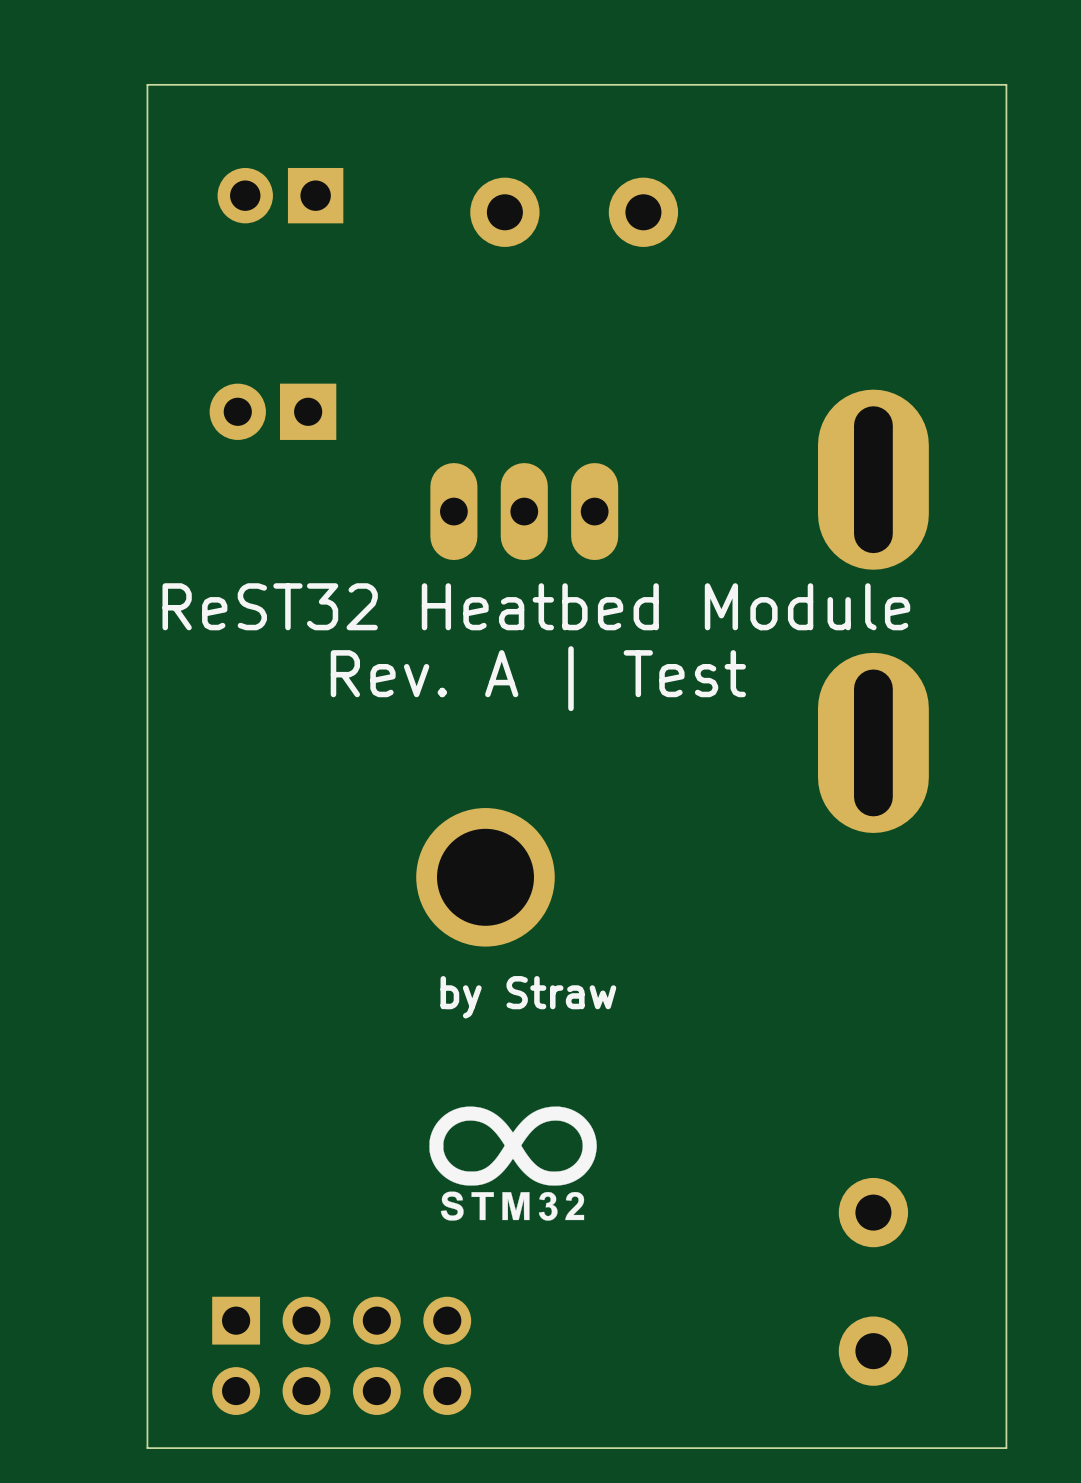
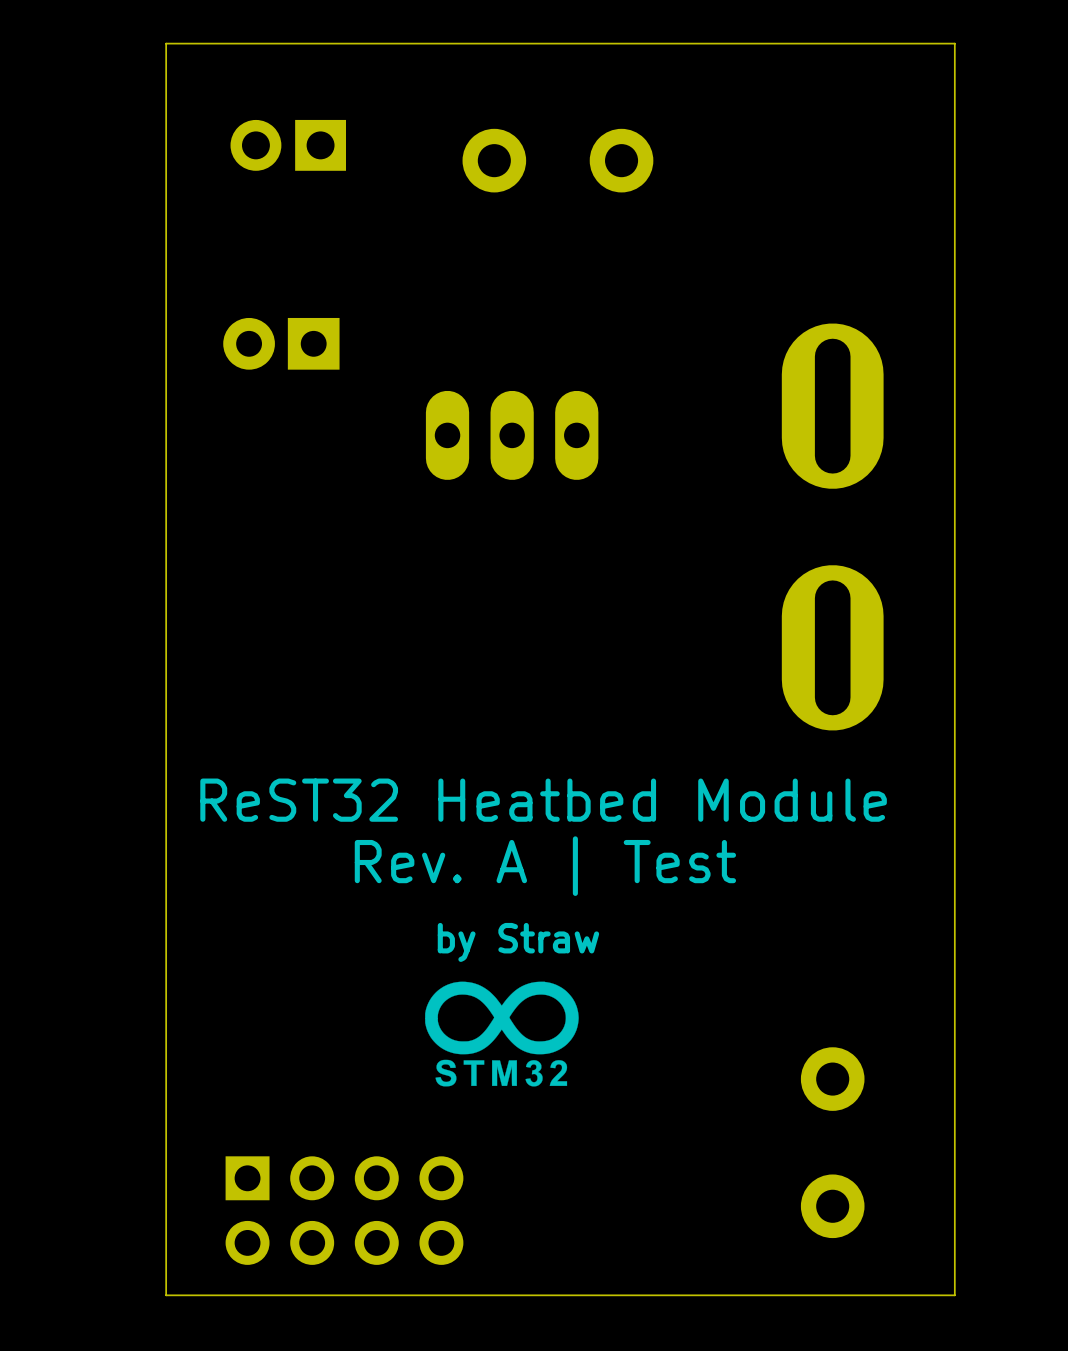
text position: ReST32 Heatbed Module (536, 606) -> ReST32 Heatbed Module (543, 800)
text position: Rev. A | Test (538, 678) -> Rev. A | Test (545, 866)
part: (485, 877) -> none
text position: by Straw (528, 997) -> by Straw (518, 942)

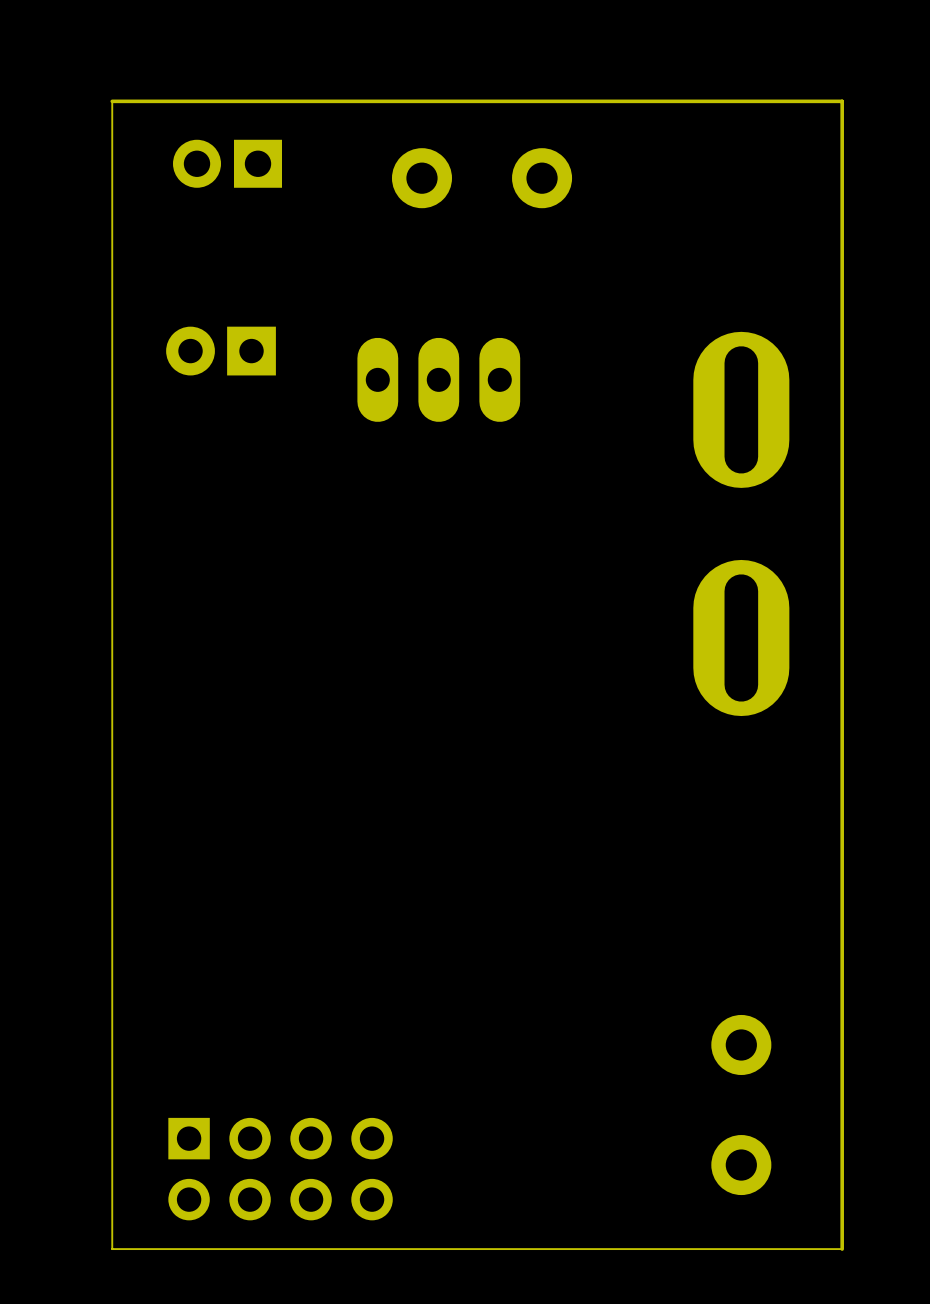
board edge: (166, 79) (166, 43) (954, 43) (954, 1295) (939, 1295) -> (112, 101) (842, 101) (842, 1249)
part position: (512, 435) -> (438, 379)
text: ReST32 Heatbed Module (543, 800) -> none
text: Rev. A | Test (545, 866) -> none
text: by Straw (518, 942) -> none
drawing: [425, 981, 579, 1087] -> none

